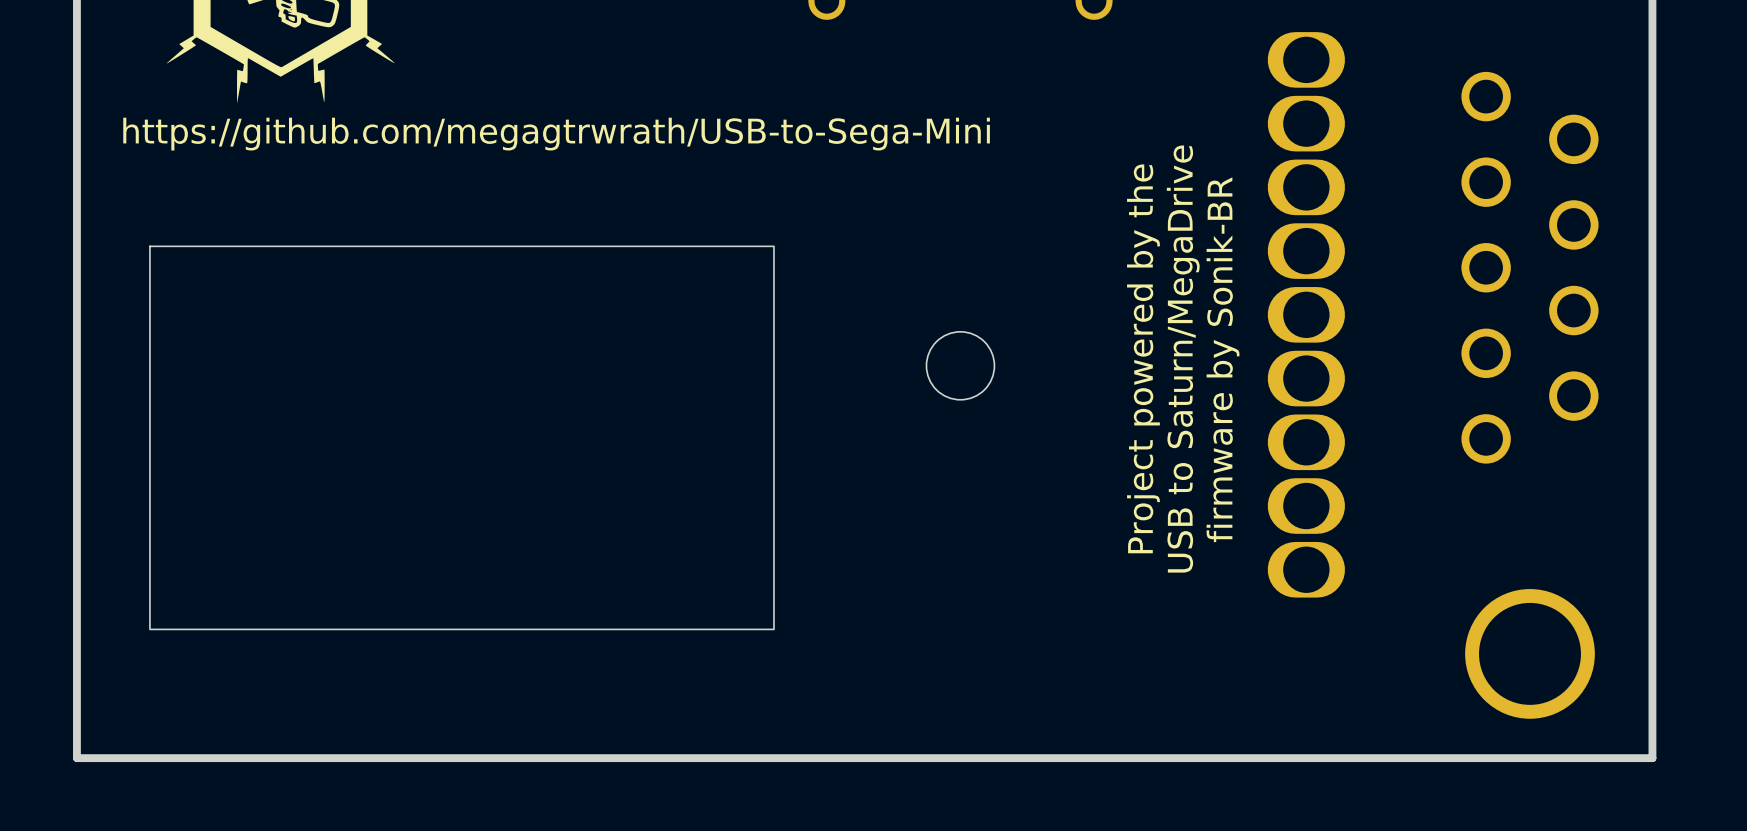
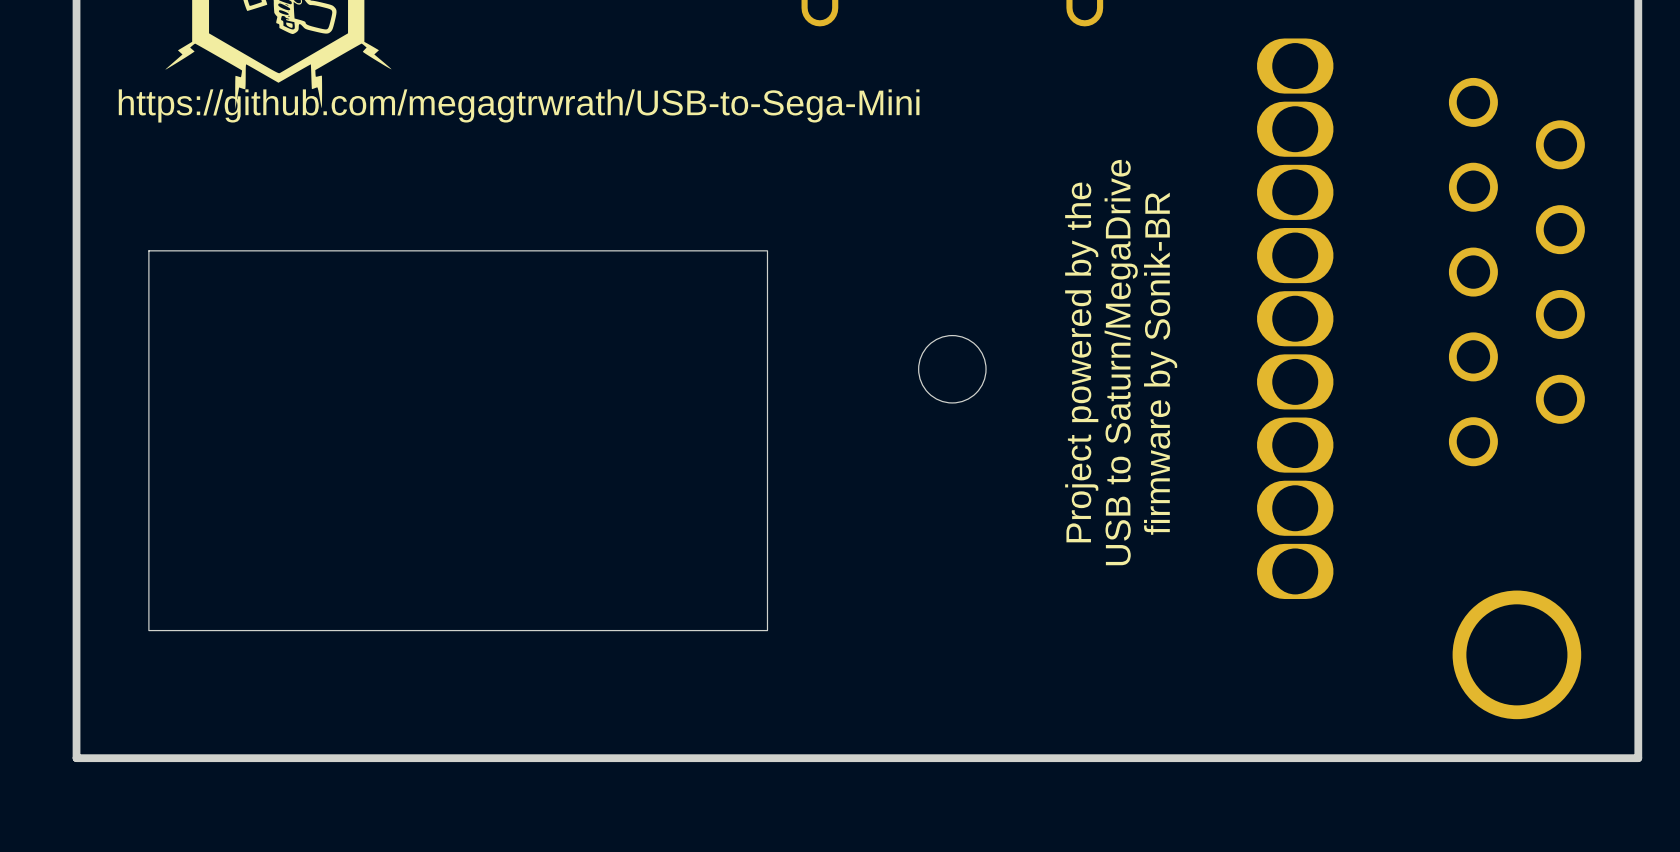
text position: https://github.com/megagtrwrath/USB-to-Sega-Mini (556, 134) -> https://github.com/megagtrwrath/USB-to-Sega-Mini (519, 105)
text position: Project powered by the (1143, 358) -> Project powered by the (1081, 362)
text position: USB to Saturn/MegaDrive (1183, 359) -> USB to Saturn/MegaDrive (1121, 362)
text position: firmware by Sonik-BR (1223, 359) -> firmware by Sonik-BR (1160, 363)

